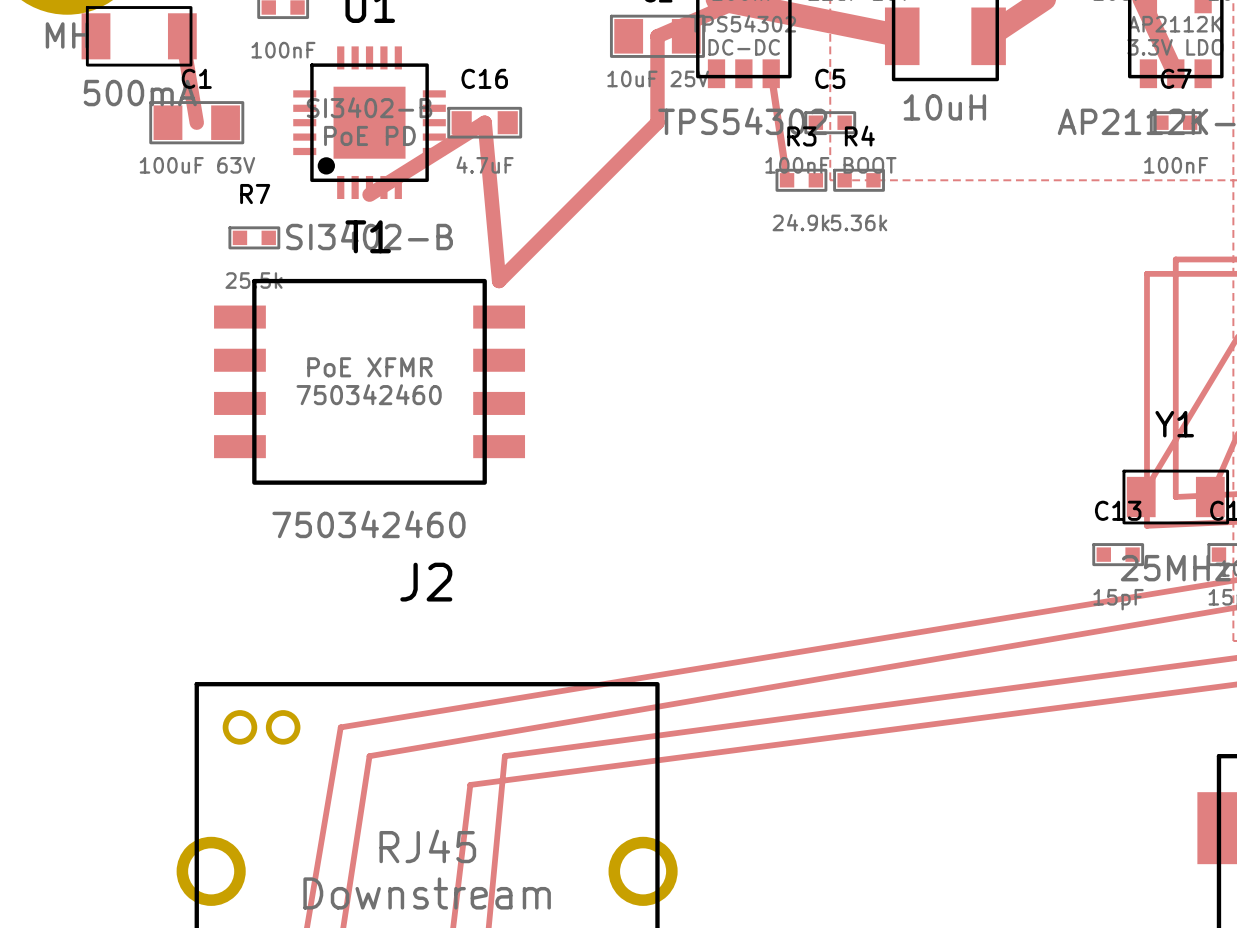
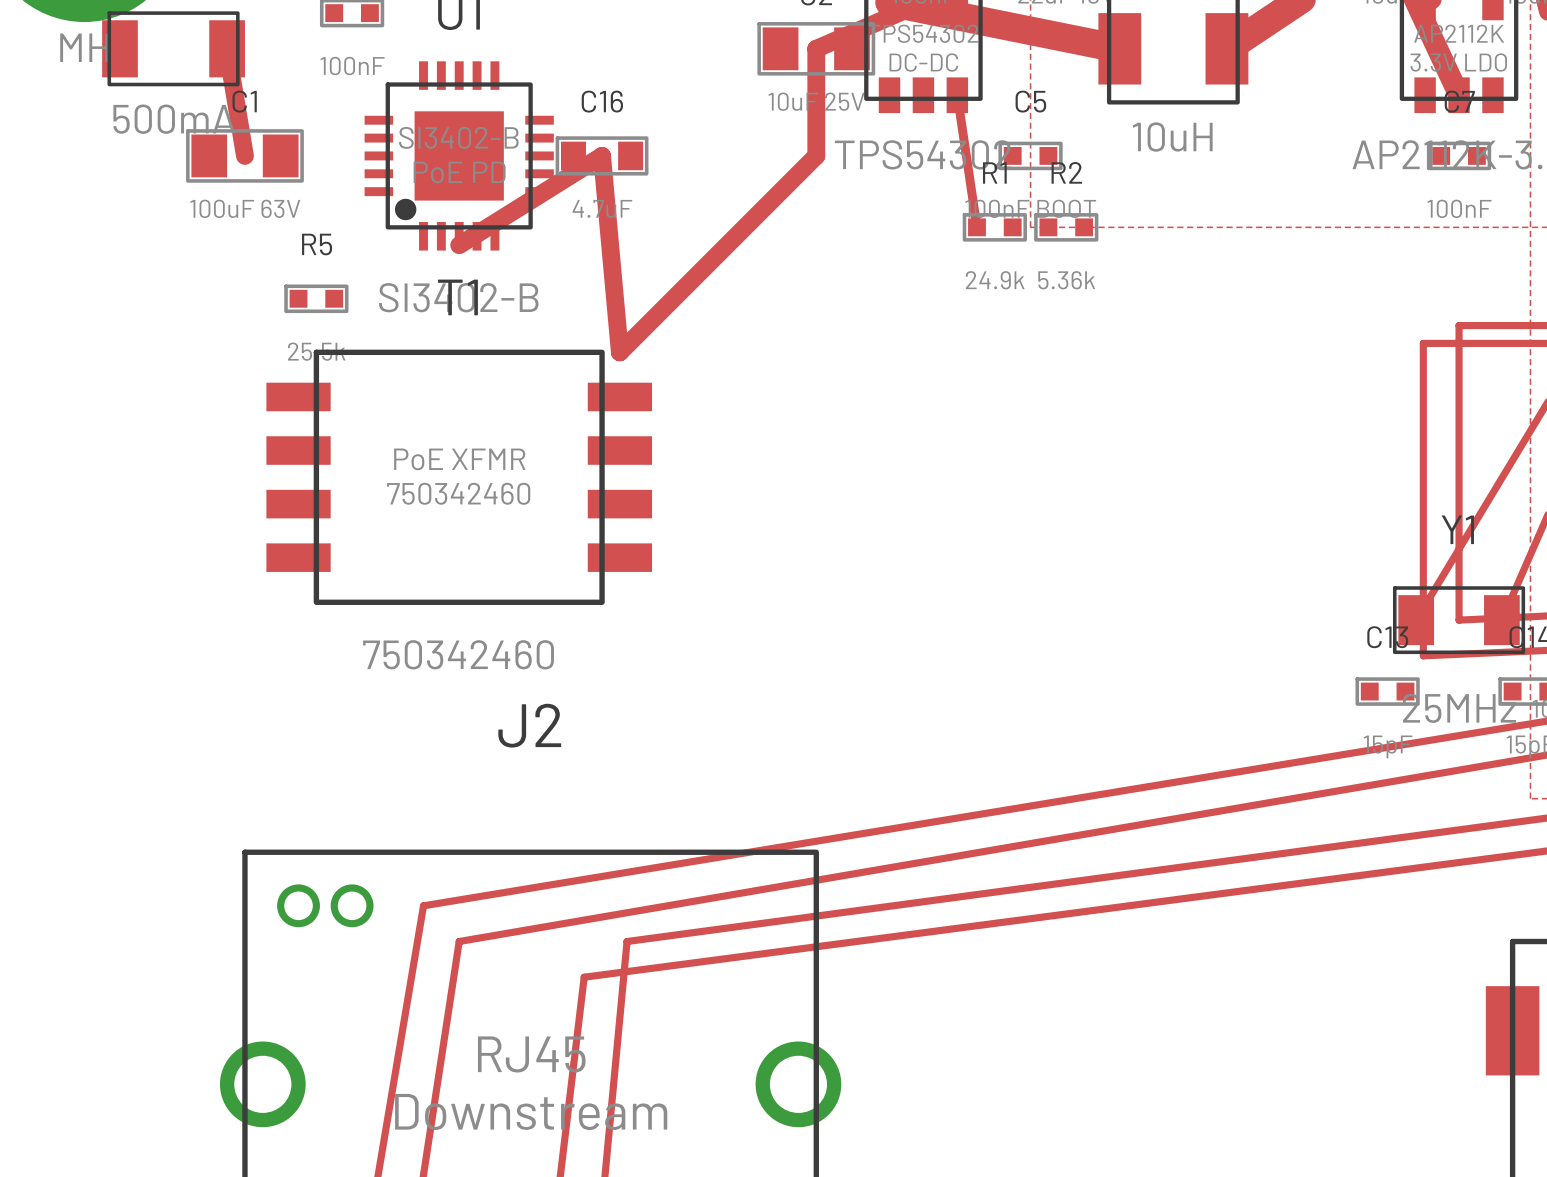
R3 name: R3 (801, 136) -> R1 (994, 172)
R4 name: R4 (859, 136) -> R2 (1066, 172)
R7 name: R7 (255, 194) -> R5 (317, 244)

